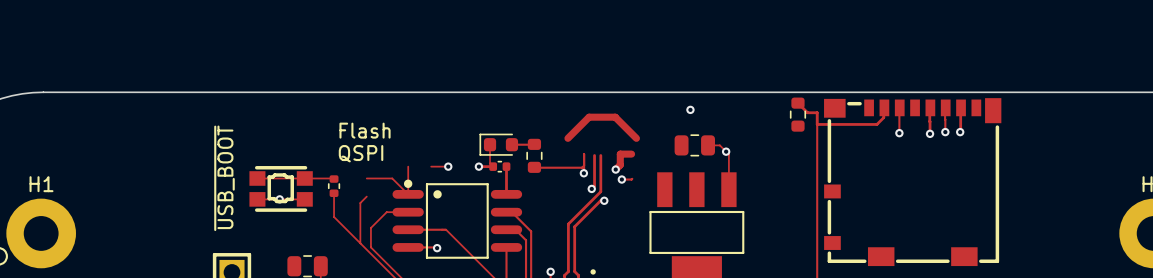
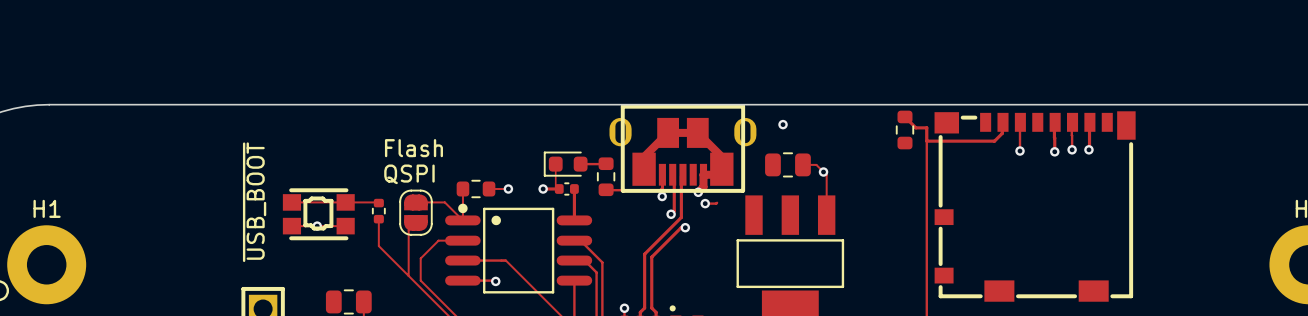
part: none -> (682, 148)
part: none -> (476, 188)
part: none -> (415, 212)

